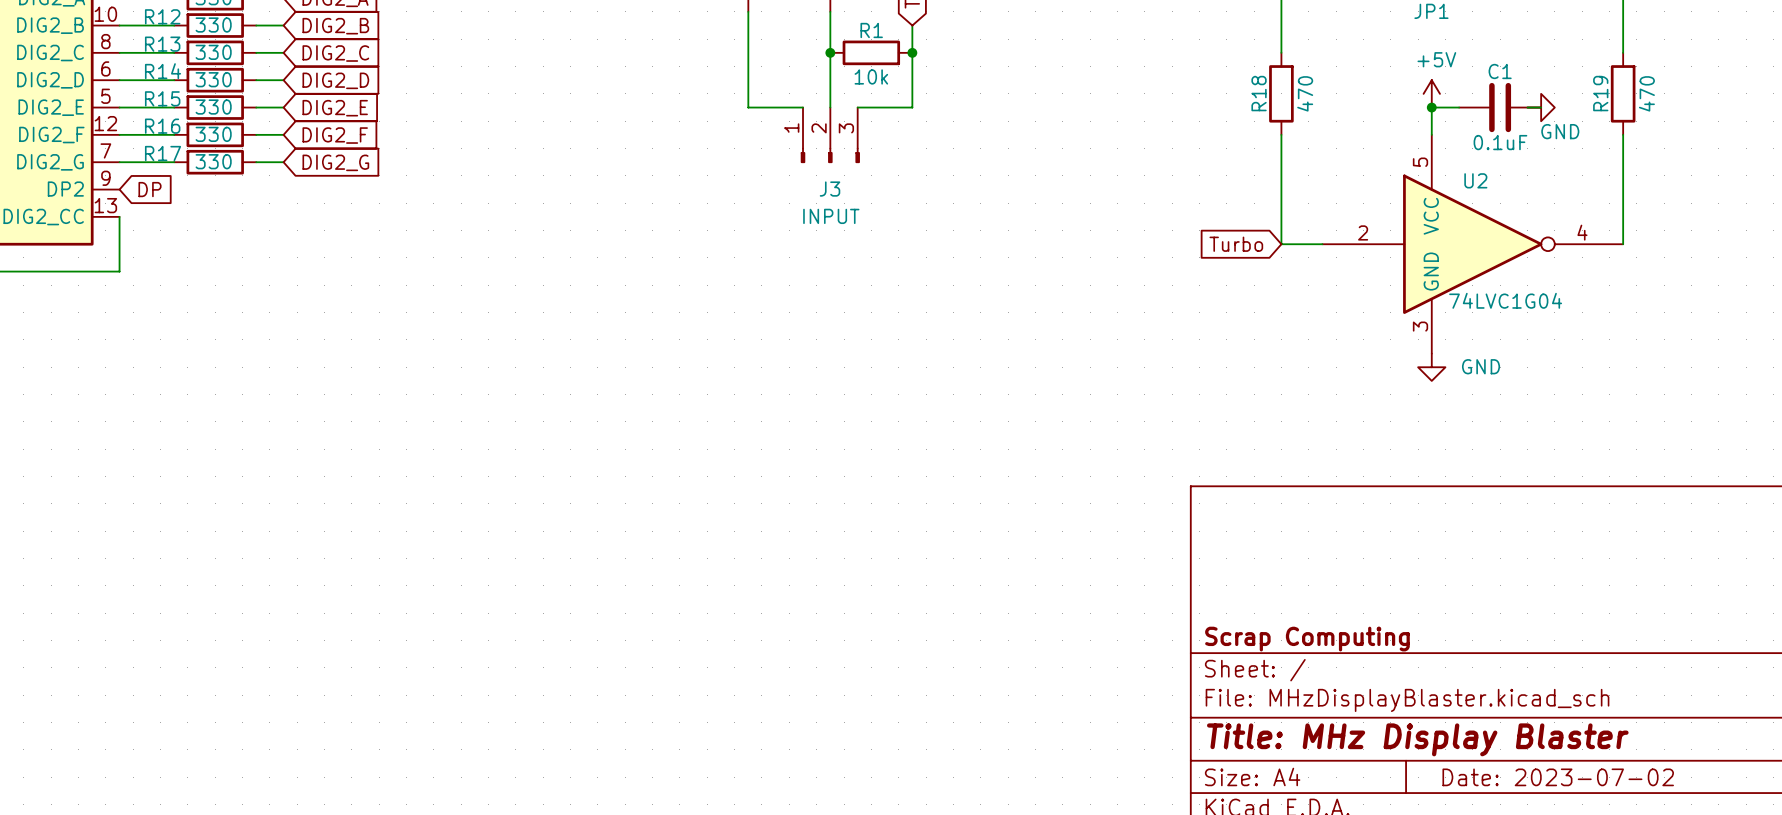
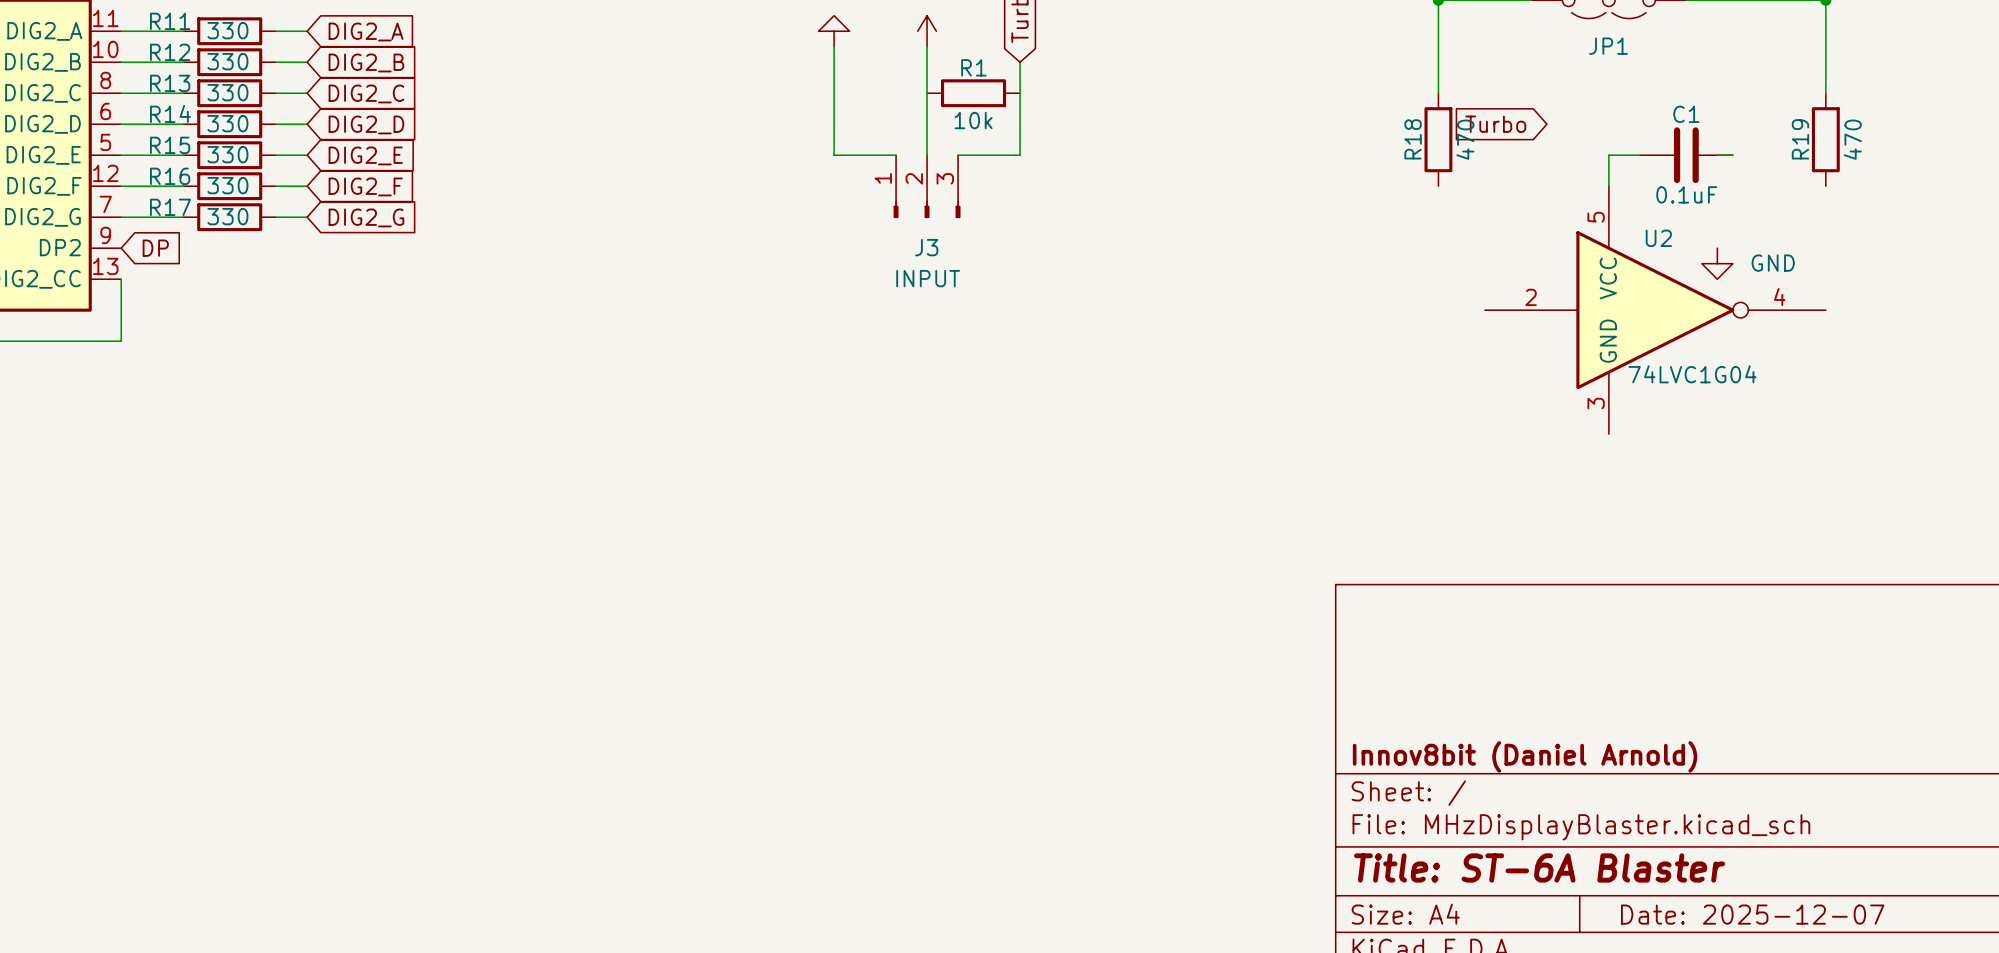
junction: (830, 52) -> none
junction: (912, 52) -> none
power symbol: +5V (1431, 93) -> none
junction: (1431, 107) -> none
power symbol: GND (1541, 107) -> none
wire: (1281, 134) (1281, 244) (1322, 244) -> none
wire: (1623, 134) (1623, 244) -> none
power symbol: none -> GND (1717, 263)
global label position: Turbo (1236, 244) -> Turbo (1495, 124)
power symbol: GND (1431, 367) -> none
title block: Scrap Computing (1307, 639) -> Innov8bit (Daniel Arnold) (1525, 756)
title block: Title: MHz Display Blaster (1417, 739) -> Title: ST-6A Blaster (1539, 867)
title block: Date: 2023-07-02 (1558, 777) -> Date: 2025-12-07 (1752, 914)

